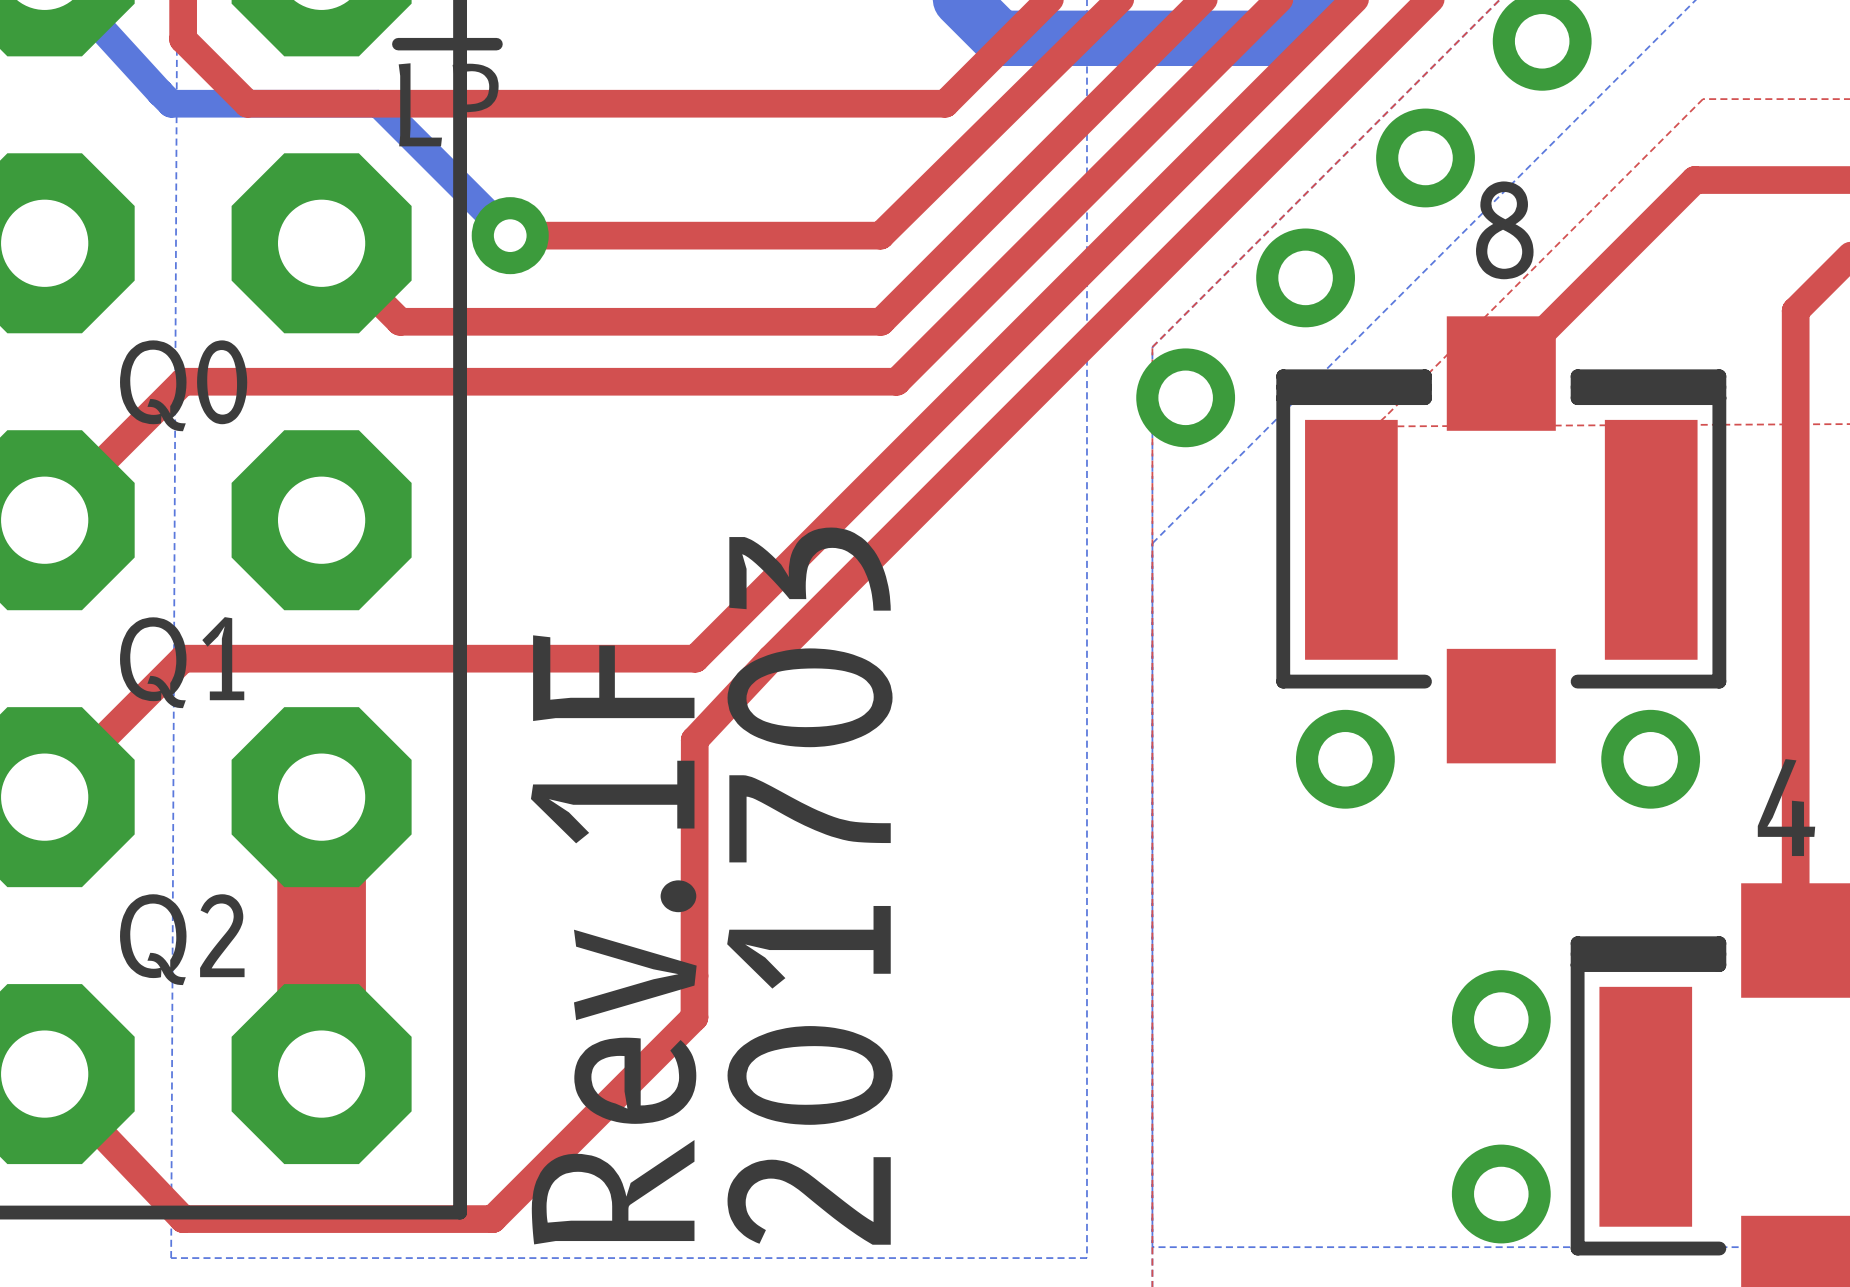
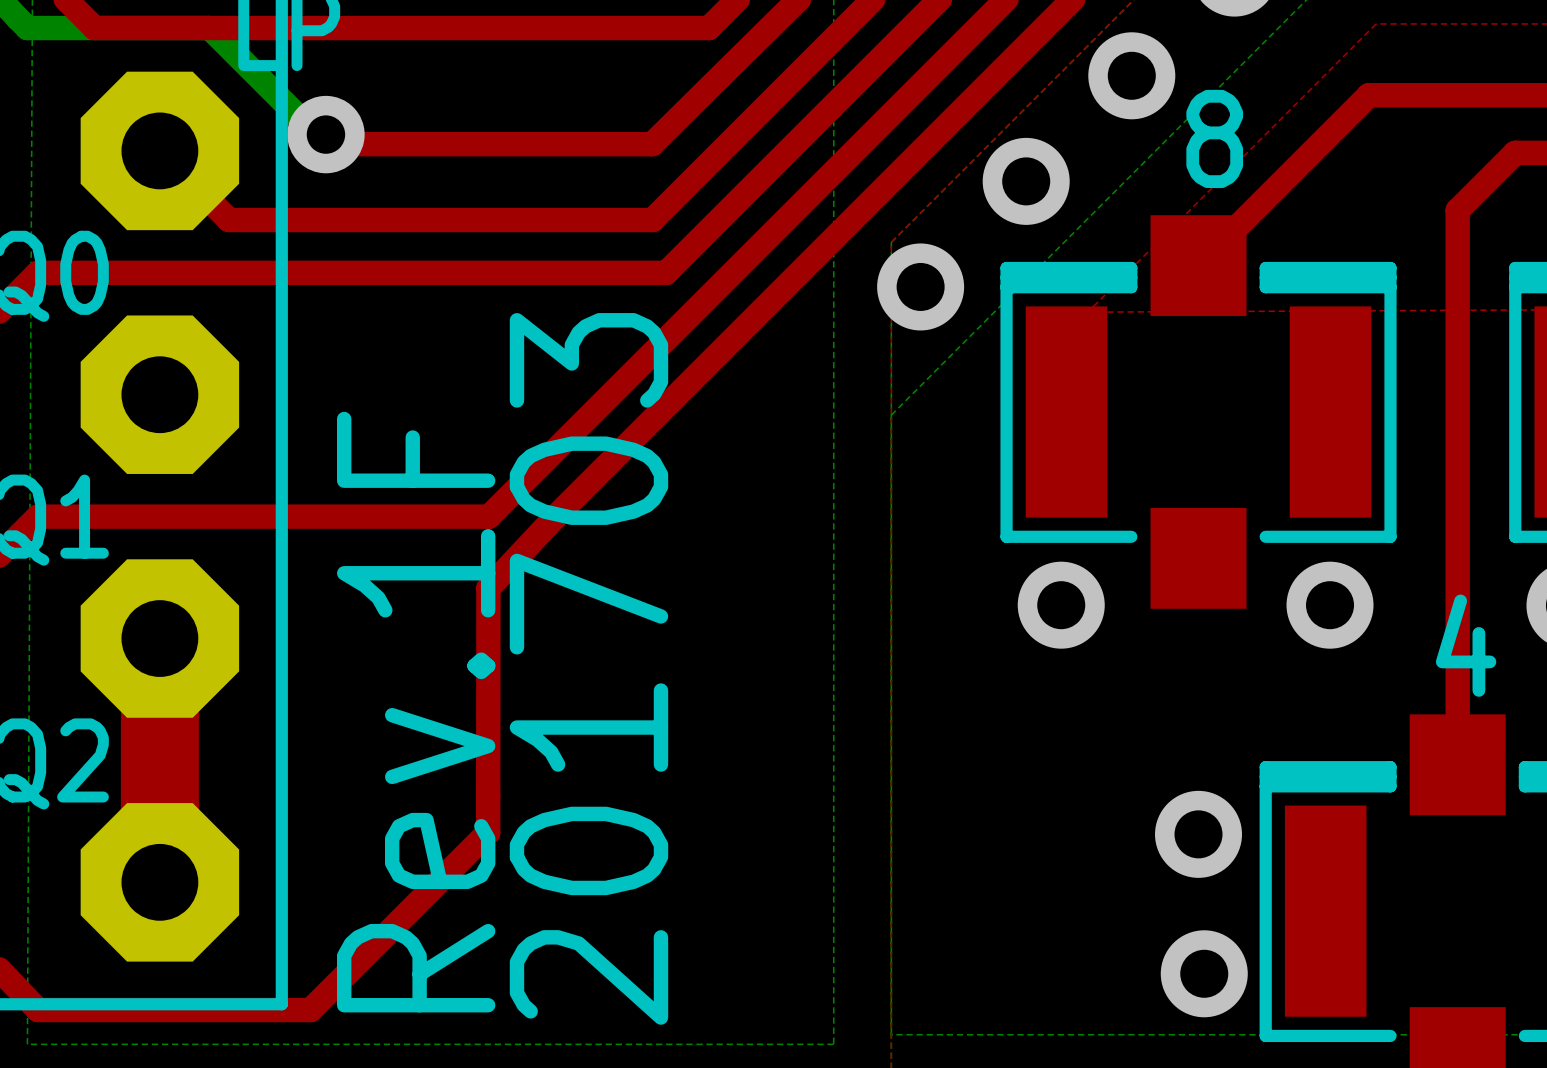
via size: [471, 197, 549, 275] -> [287, 95, 365, 174]
via position: (1501, 1194) -> (1204, 973)

